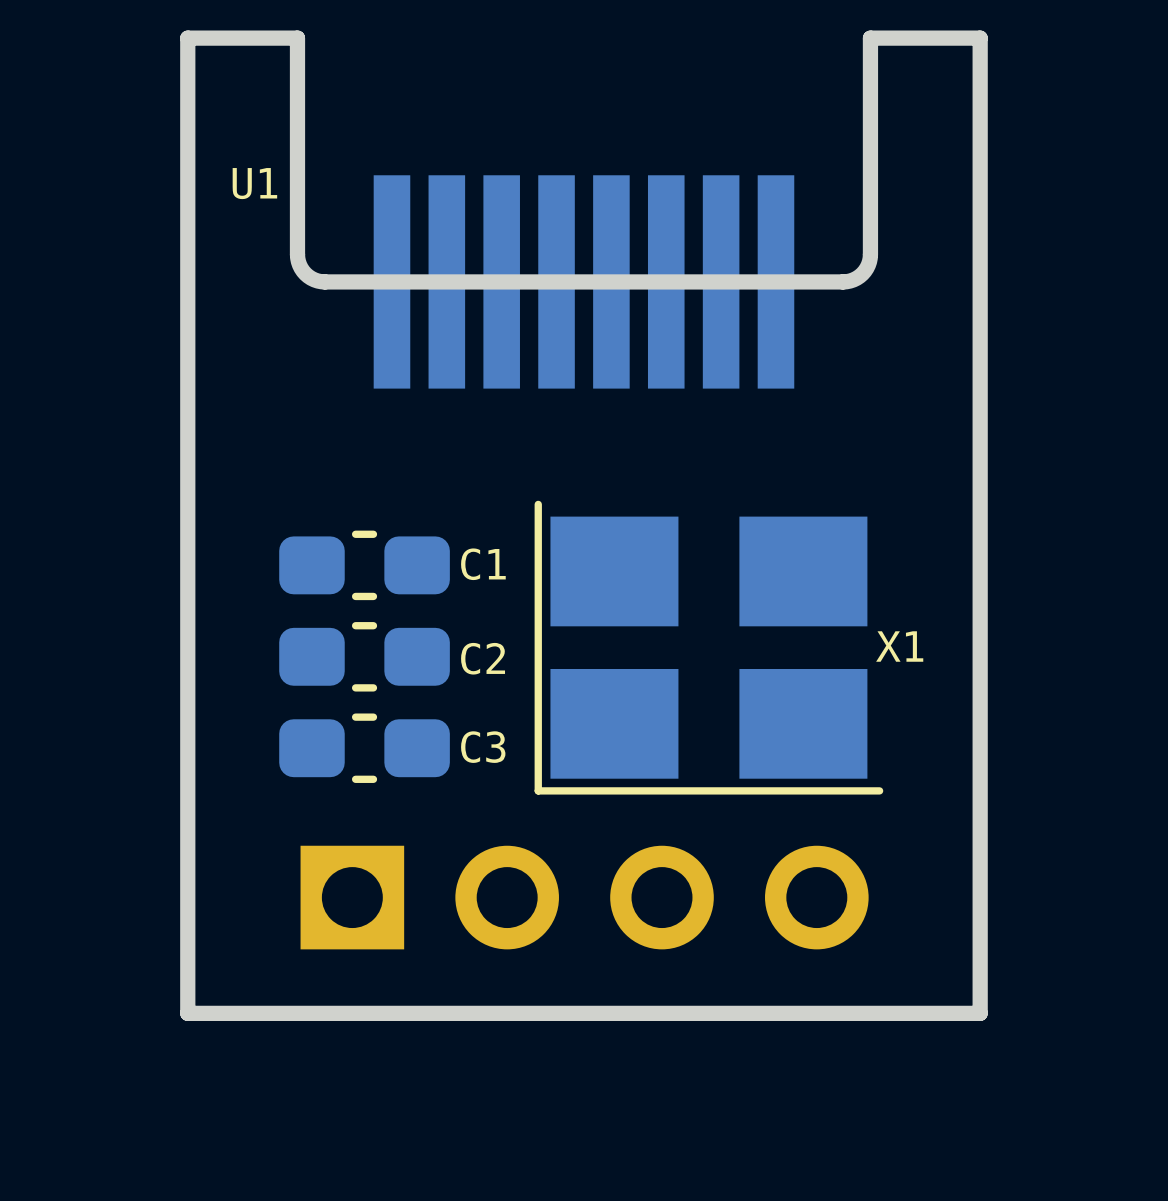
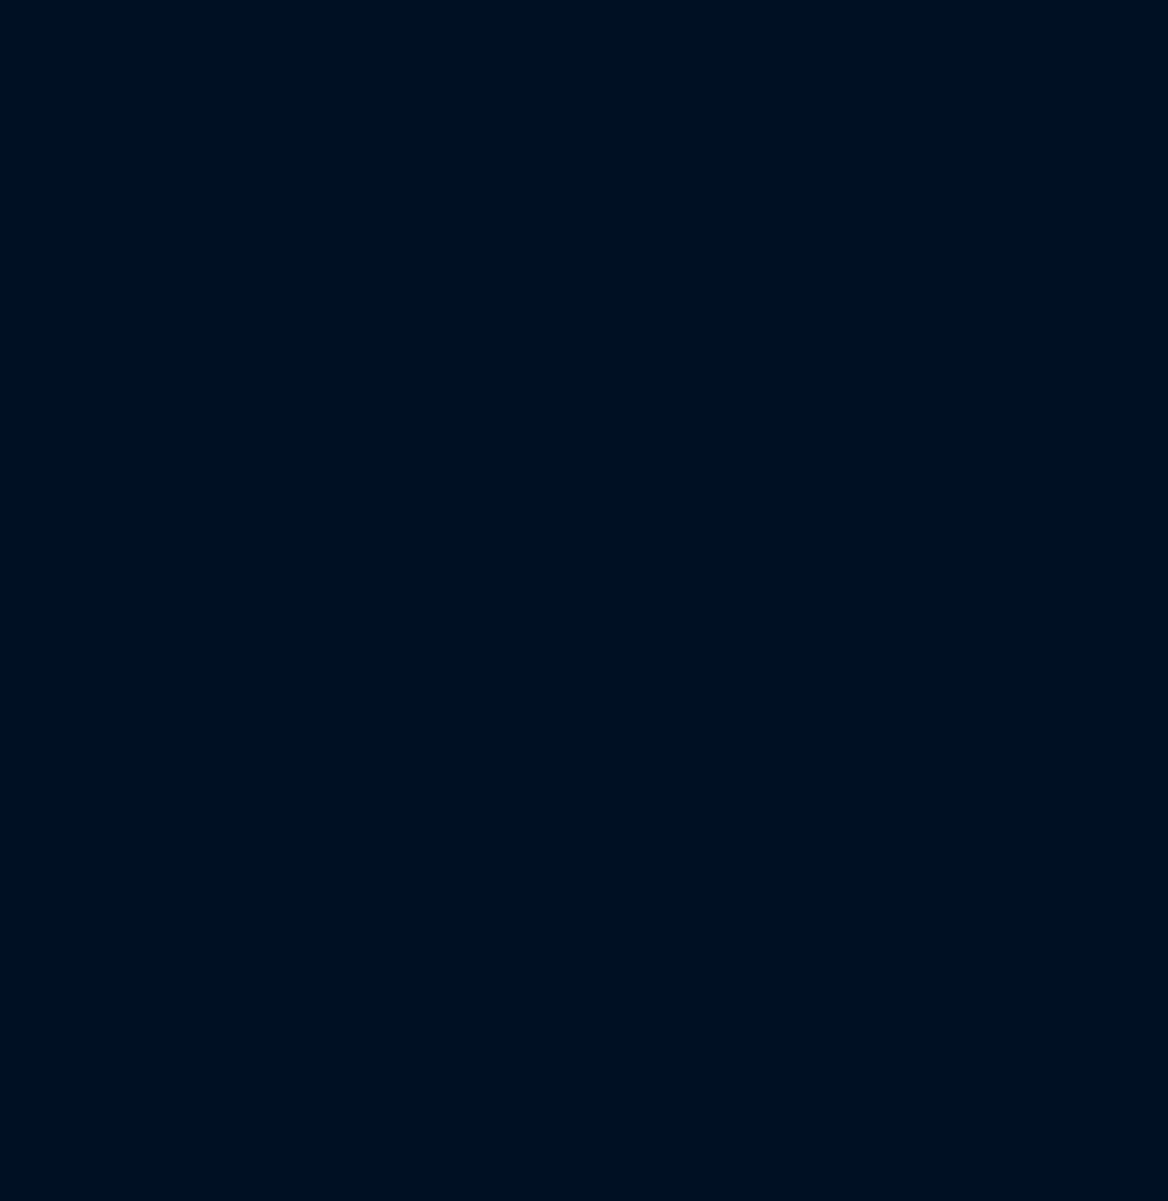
board edge: (870, 38) (980, 38) (980, 1013) (187, 1013) (187, 38) (297, 38) -> none
U1: (583, 209) -> none
C1: (364, 565) -> none
X1: (708, 647) -> none
C2: (364, 656) -> none
C3: (364, 748) -> none
part: (584, 897) -> none

